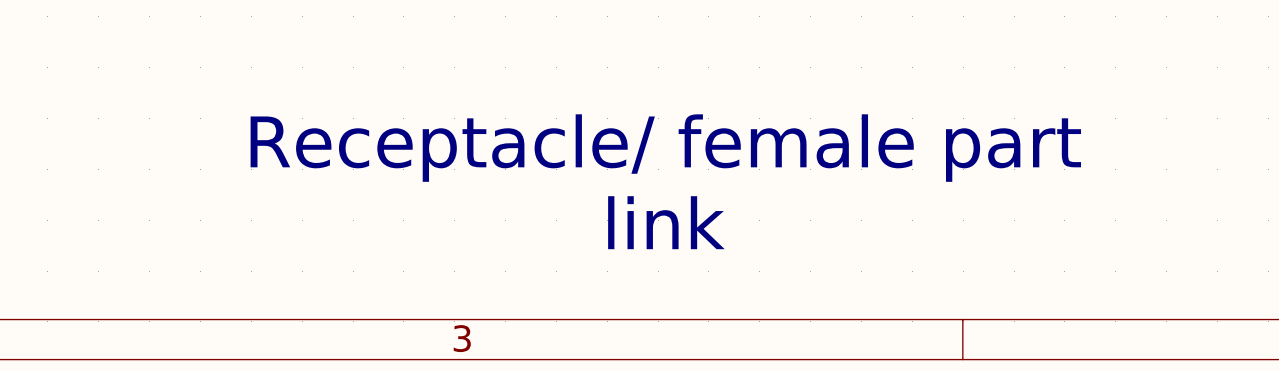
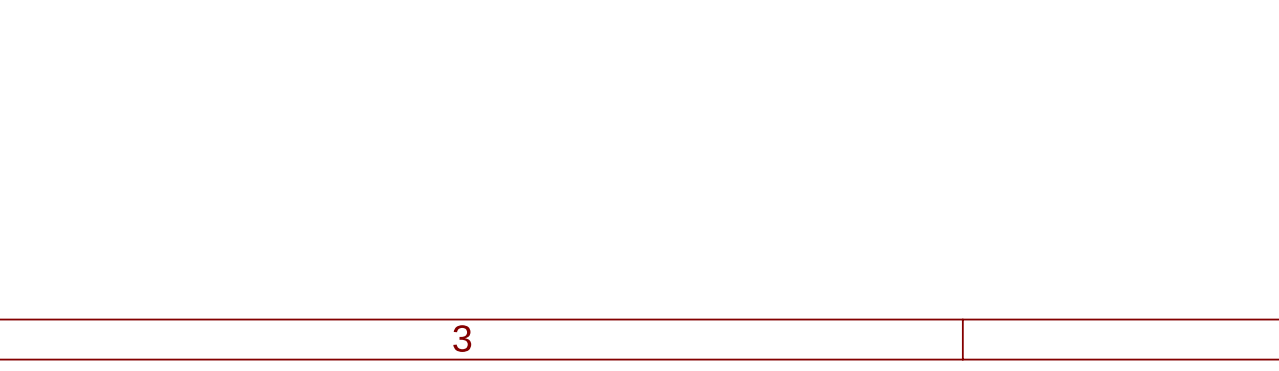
text: Receptacle/ female part (665, 148) -> none
text: link (666, 222) -> none

